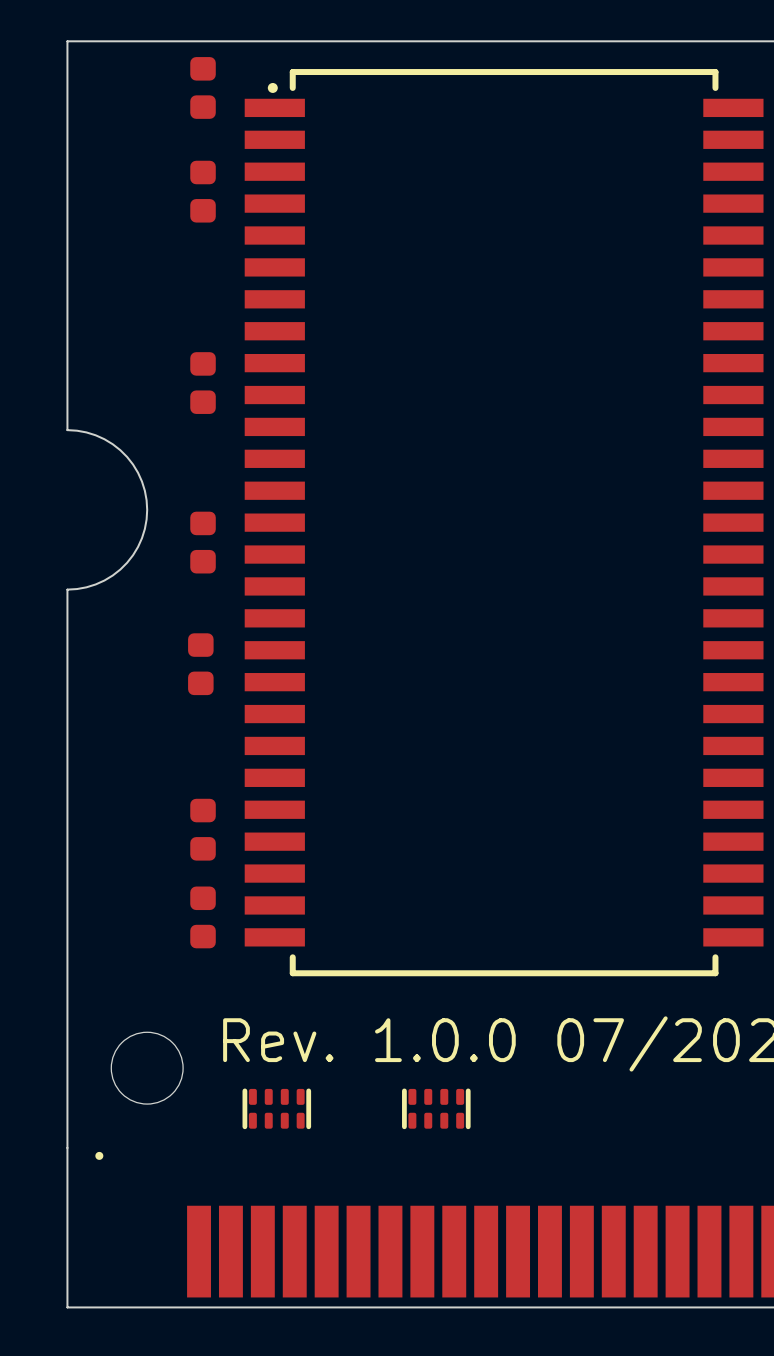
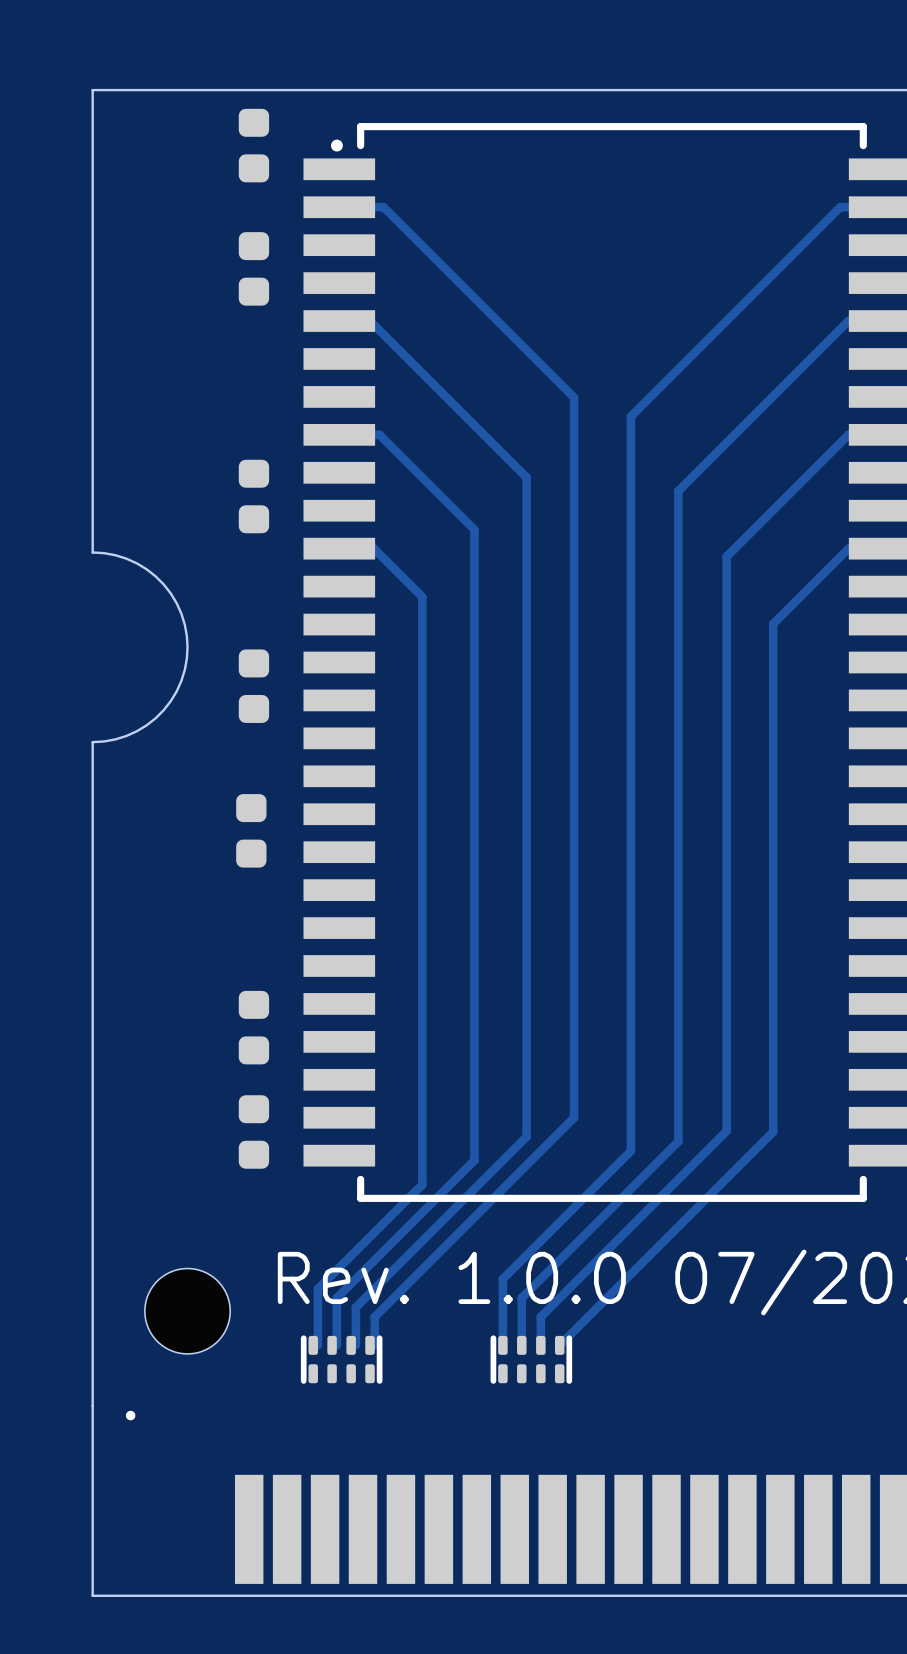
track: none -> (339, 207) (383, 207) (574, 397) (574, 1117) (374, 1317) (374, 1345)
track: none -> (884, 207) (840, 207) (630, 416) (630, 1150) (502, 1278) (502, 1345)
track: none -> (339, 321) (370, 321) (526, 477) (526, 1136) (355, 1307) (355, 1345)
track: none -> (884, 321) (848, 321) (678, 491) (678, 1141) (521, 1298) (521, 1345)
track: none -> (339, 434) (379, 434) (474, 529) (474, 1160) (336, 1298) (336, 1345)
track: none -> (884, 434) (848, 434) (726, 556) (726, 1131) (540, 1316) (540, 1345)
track: none -> (339, 548) (373, 548) (422, 597) (422, 1184) (317, 1288) (317, 1345)
track: none -> (884, 548) (848, 548) (773, 623) (773, 1131) (559, 1345)

